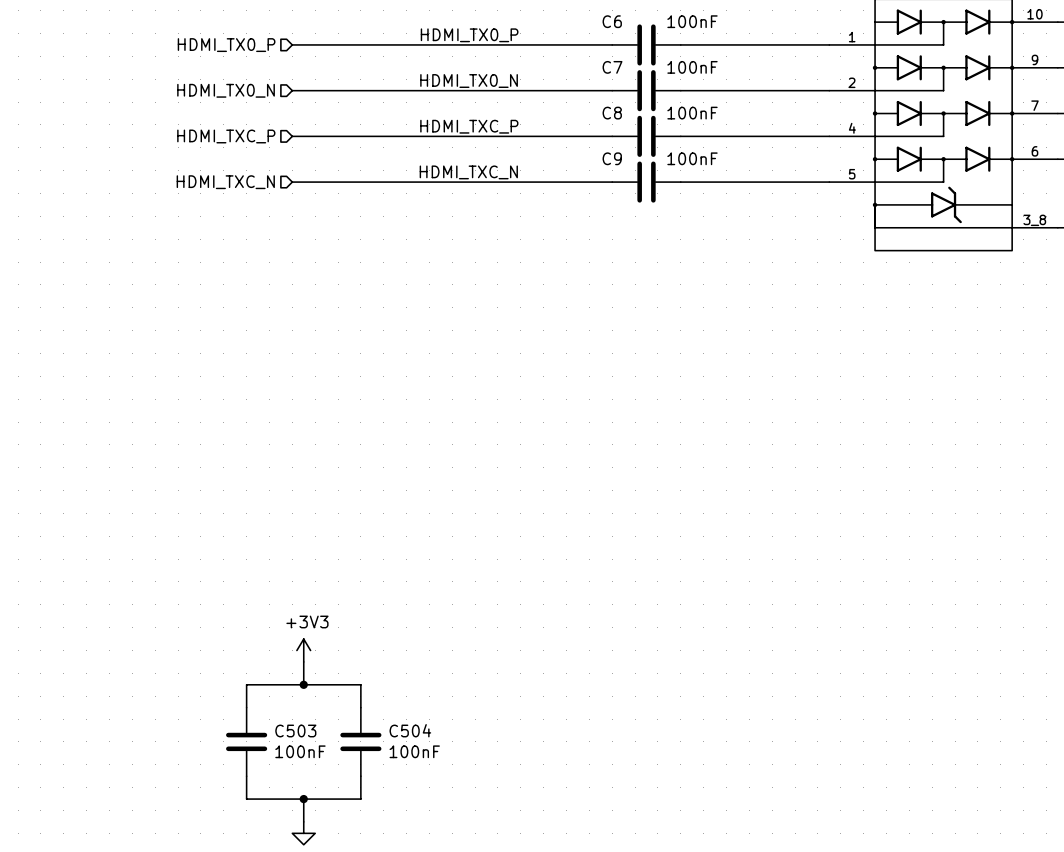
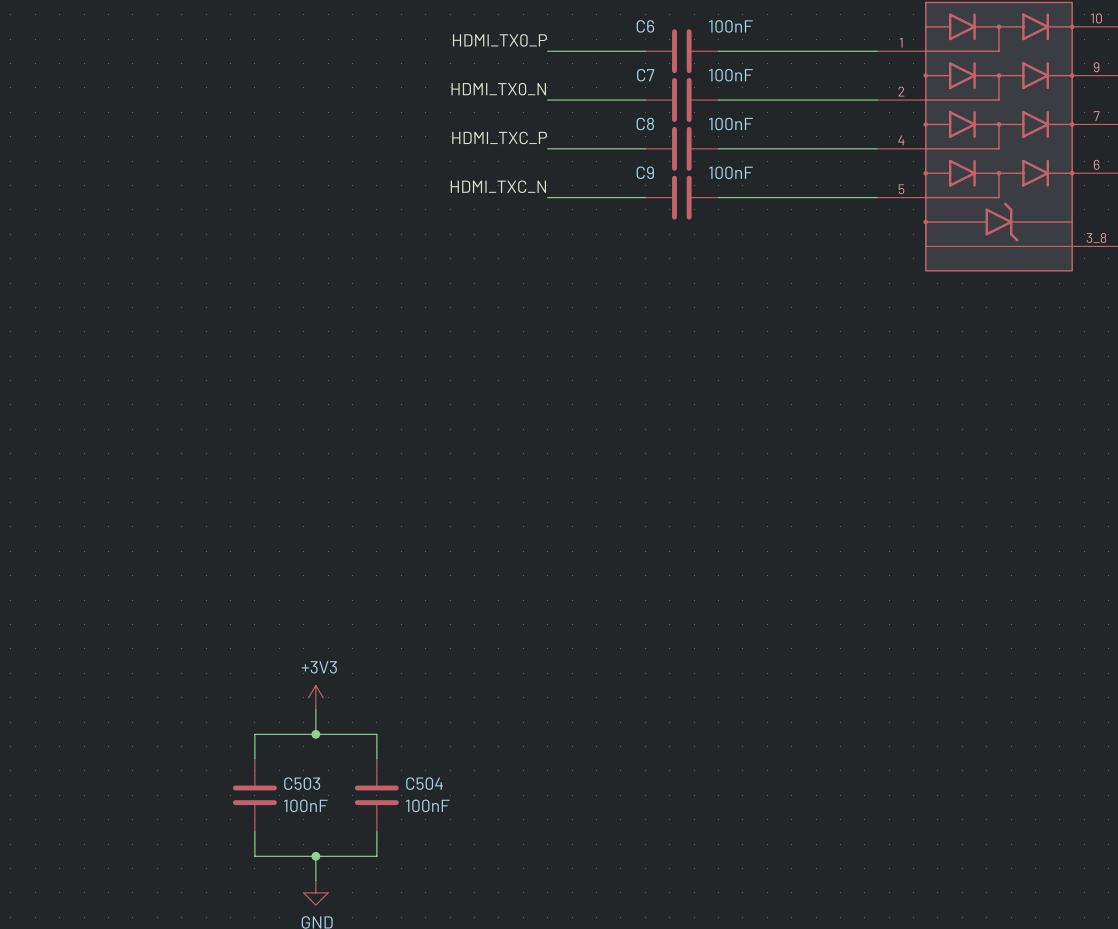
wire: (292, 44) (520, 44) -> none
hierarchical label: HDMI_TX0_P (226, 45) -> none
hierarchical label: HDMI_TX0_N (226, 90) -> none
wire: (292, 90) (520, 90) -> none
hierarchical label: HDMI_TXC_P (226, 136) -> none
wire: (292, 136) (520, 136) -> none
hierarchical label: HDMI_TXC_N (225, 182) -> none
wire: (292, 182) (520, 182) -> none

